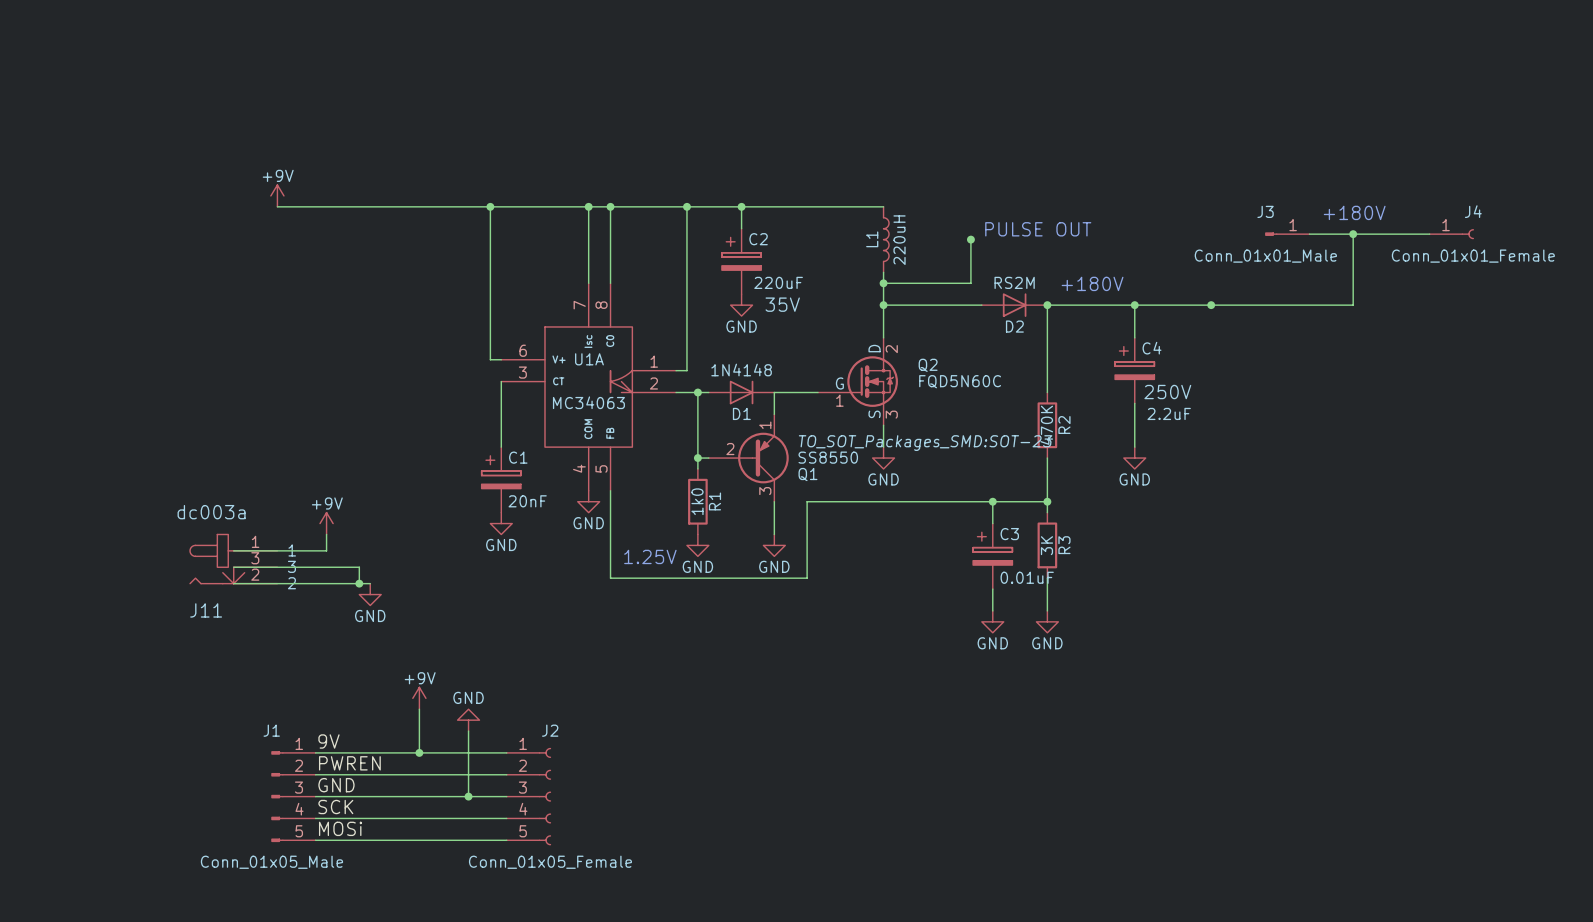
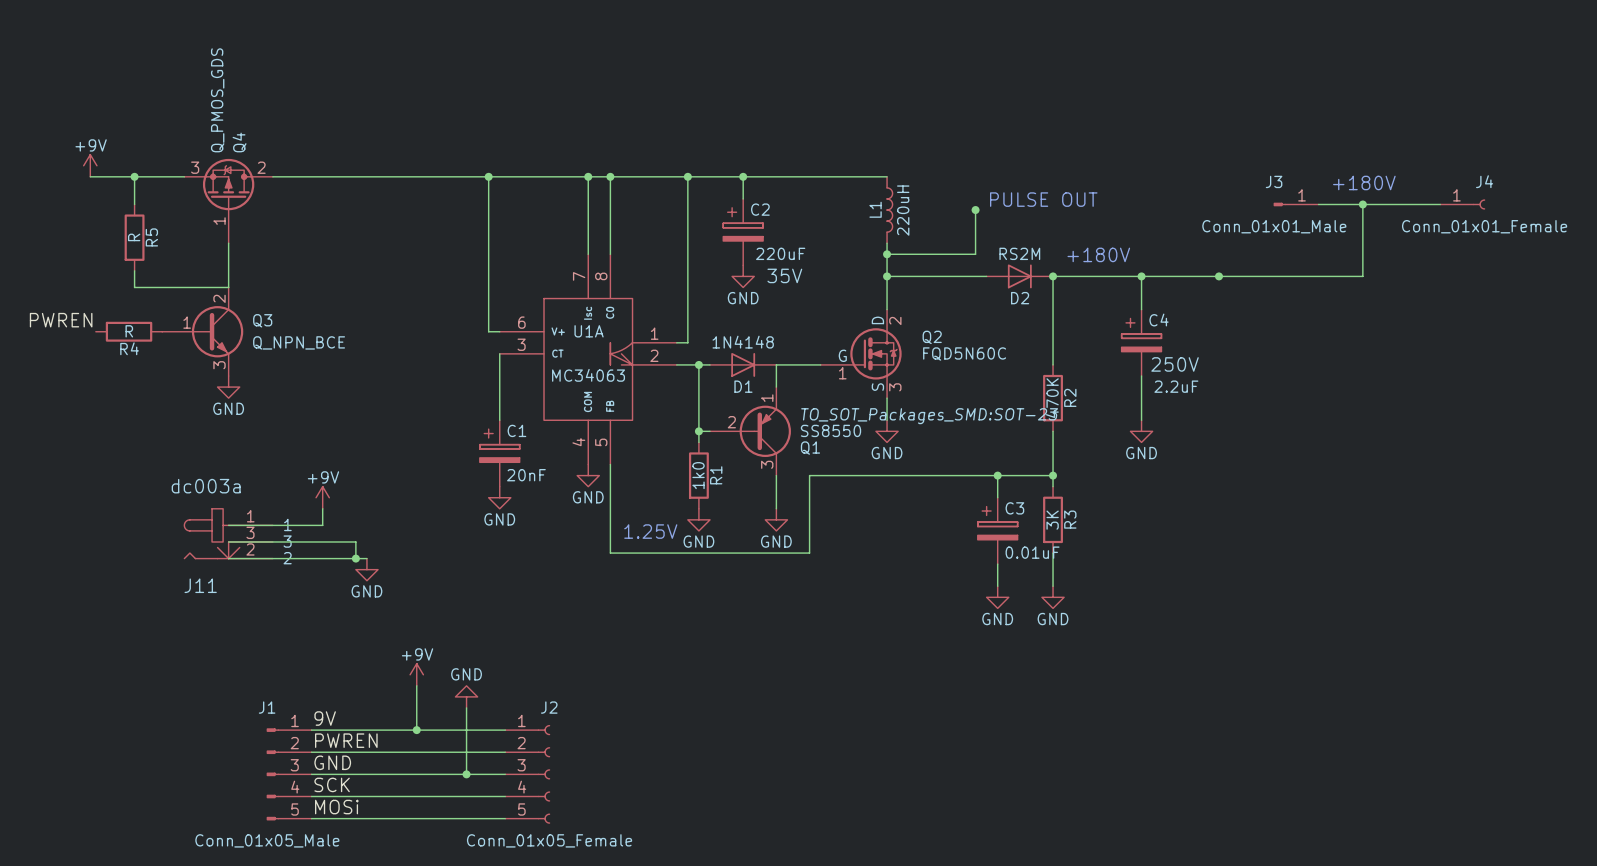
power symbol position: +9V (277, 195) -> +9V (90, 165)
wire: none -> (90, 176) (184, 176)
wire: none -> (134, 176) (134, 204)
junction: none -> (134, 176)
Q4: none -> Q_PMOS_GDS (228, 201)
R5: none -> R (134, 237)
wire: none -> (228, 243) (228, 287) (134, 287) (134, 270)
label: none -> PWREN (61, 320)
R4: none -> R (129, 331)
Q3: none -> Q_NPN_BCE (202, 331)
power symbol: none -> GND (228, 387)

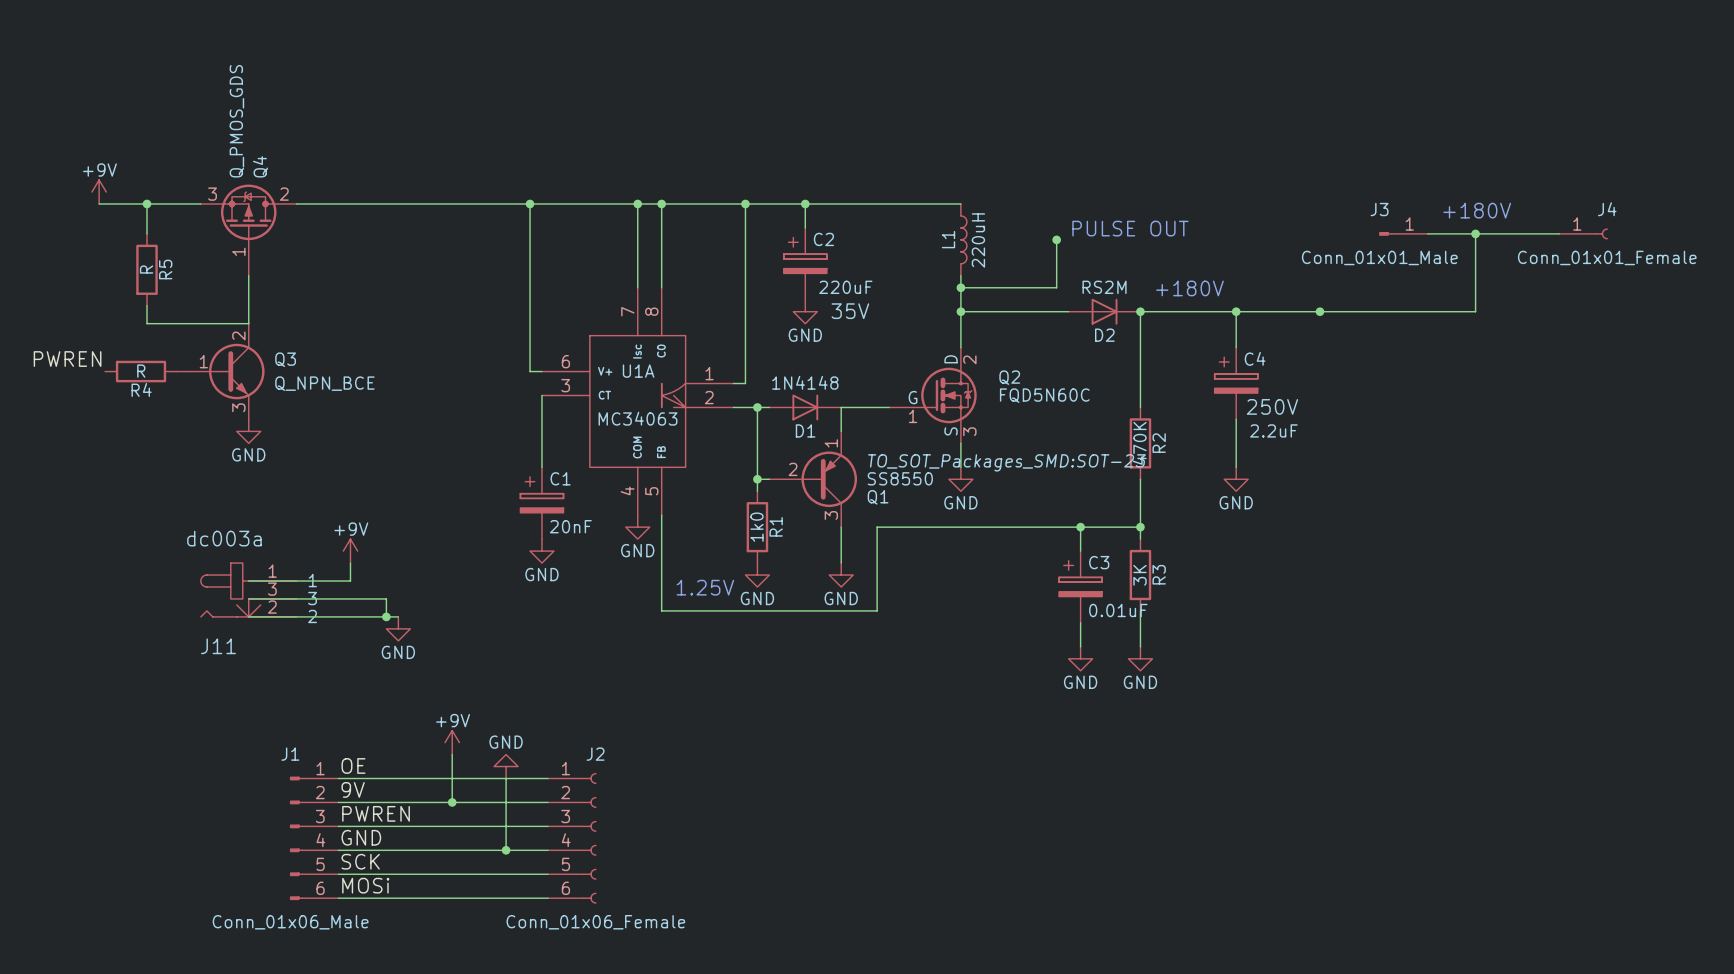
label: none -> OE (353, 765)
wire: none -> (338, 778) (547, 778)
J2 symbol: [505, 725, 551, 824] -> [547, 773, 597, 904]
J1 symbol: [266, 728, 312, 821] -> [289, 776, 339, 901]
J1 value: Conn_01x05_Male (267, 840) -> Conn_01x06_Male (290, 922)
J2 value: Conn_01x05_Female (549, 840) -> Conn_01x06_Female (595, 922)

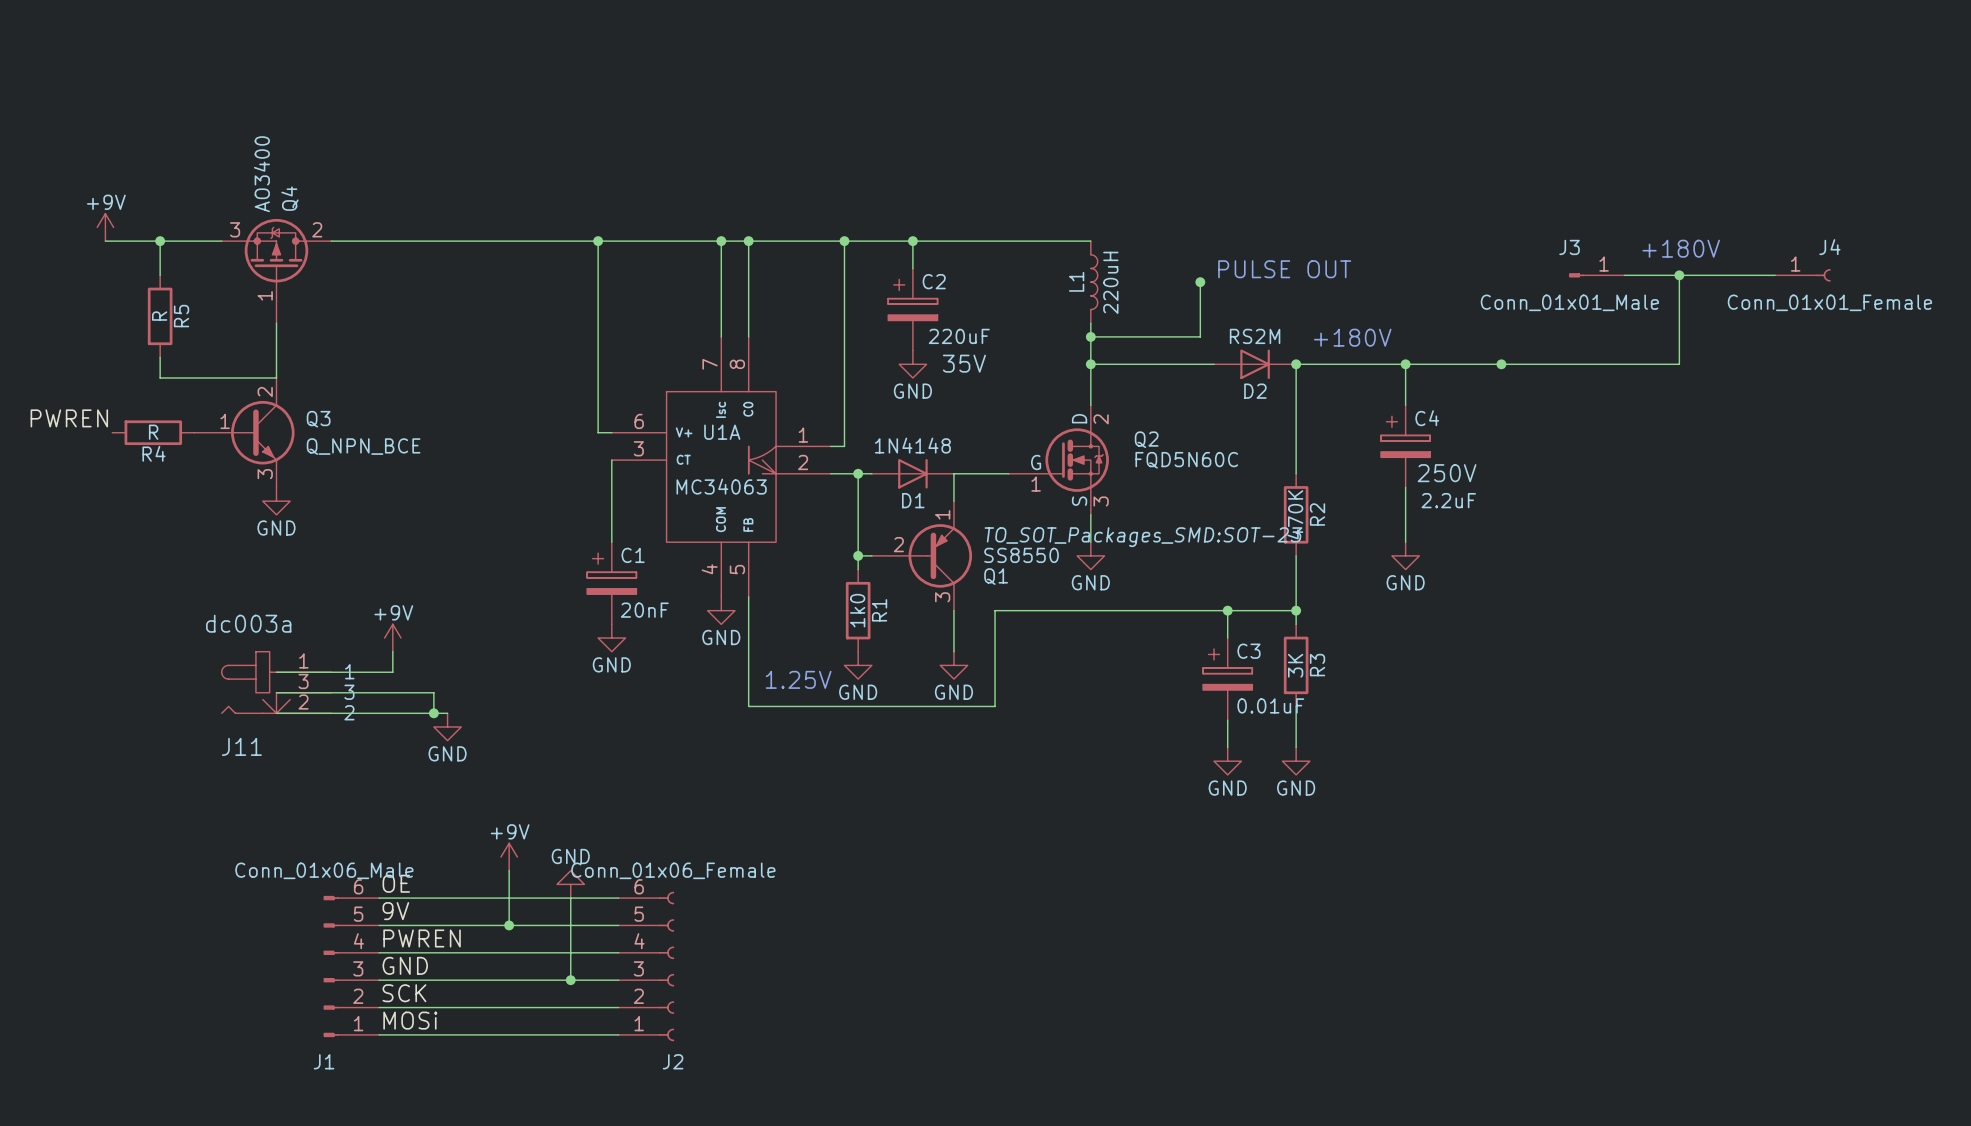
Q4 value: Q_PMOS_GDS (236, 121) -> AO3400 (261, 174)
J1 flip: as is (296, 838) -> up-down (331, 966)
J2 flip: as is (589, 838) -> up-down (666, 966)

